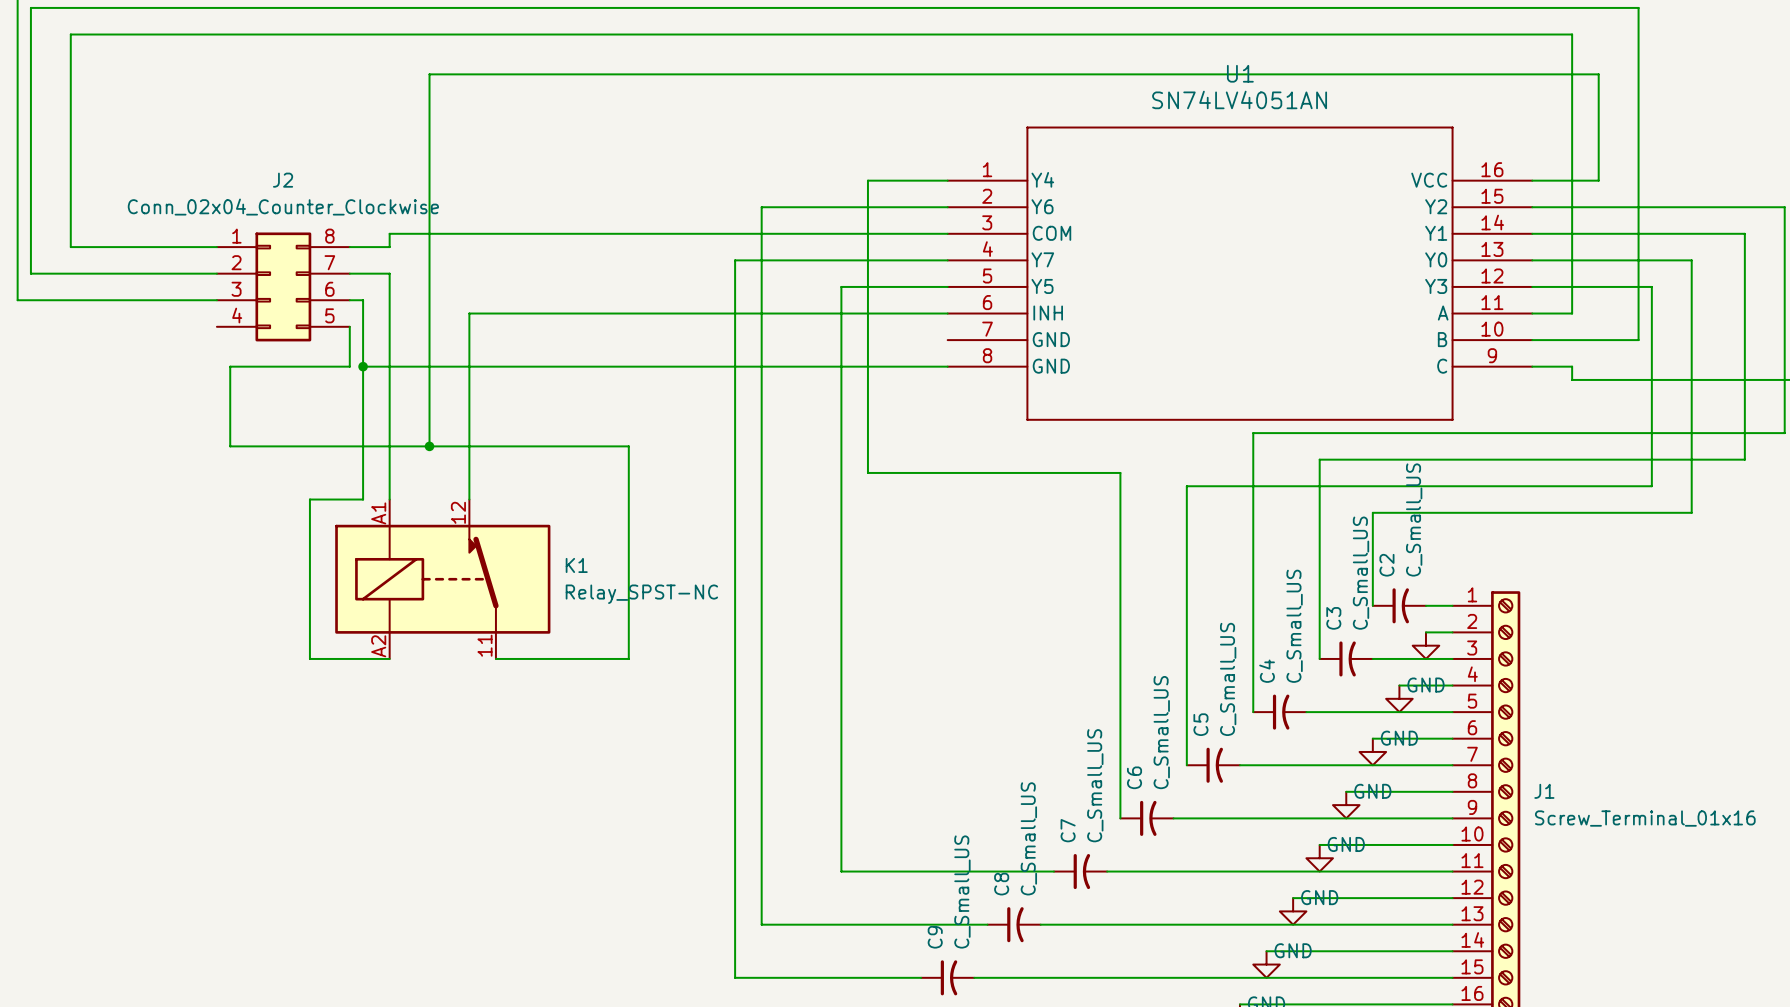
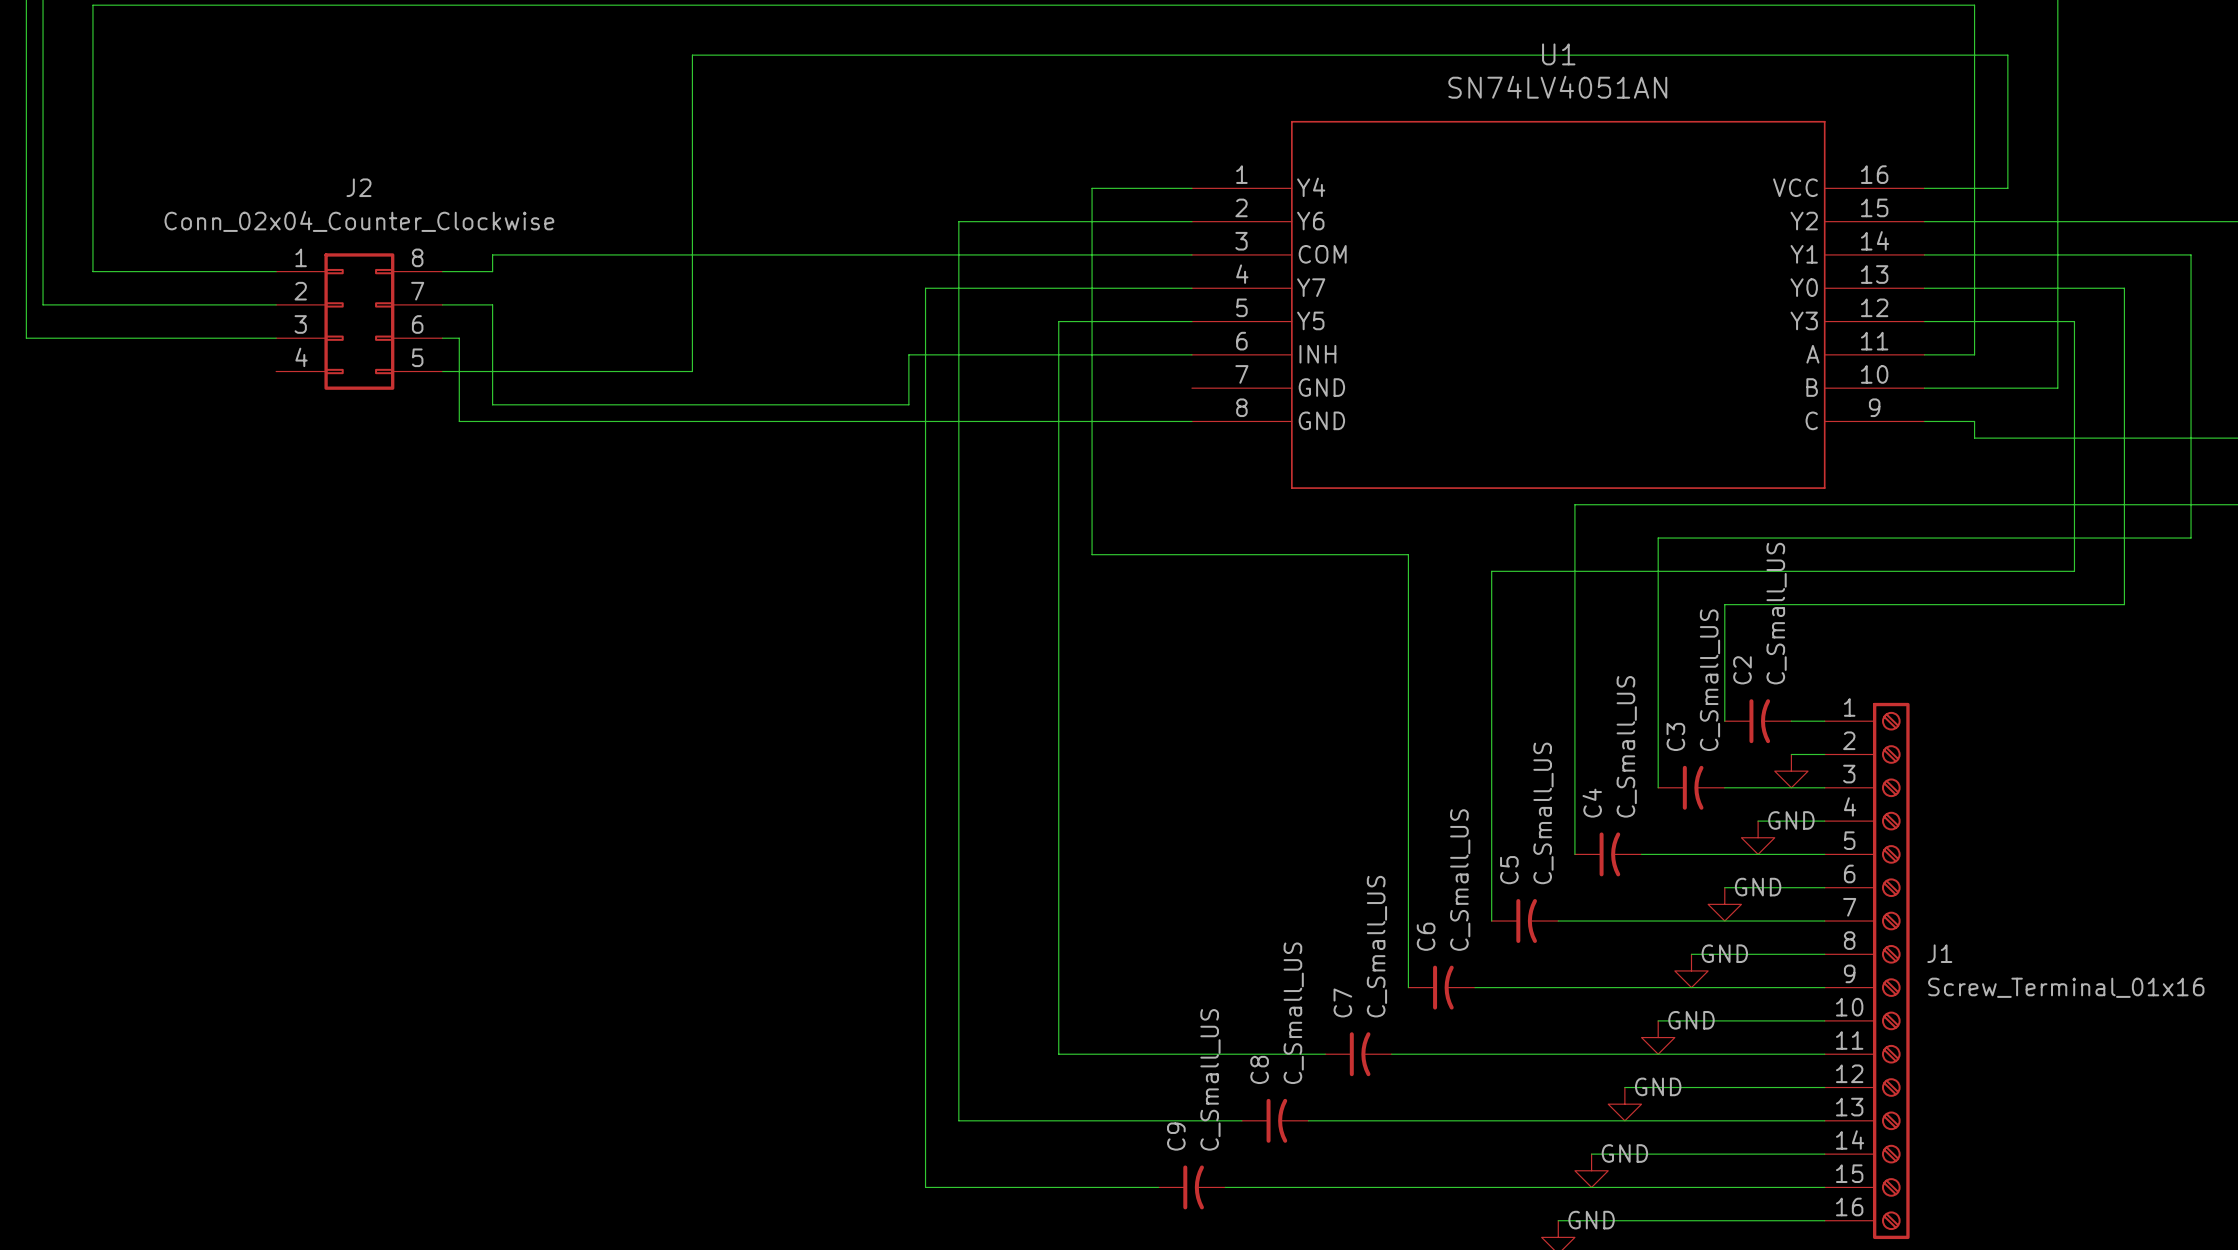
wire: (549, 74) (429, 74) (429, 446) -> (692, 55) (692, 371) (442, 371)
wire: (721, 313) (469, 313) (469, 499) -> (908, 354) (908, 404) (492, 404)
wire: (349, 326) (349, 366) (230, 366) (230, 446) (628, 446) (628, 658) (495, 658) -> none
wire: (389, 353) (389, 499) -> none
wire: (363, 366) (363, 499) (309, 499) (309, 658) (389, 658) -> none
junction: (363, 366) -> none
junction: (429, 446) -> none
K1: Relay_SPST-NC (442, 579) -> none

